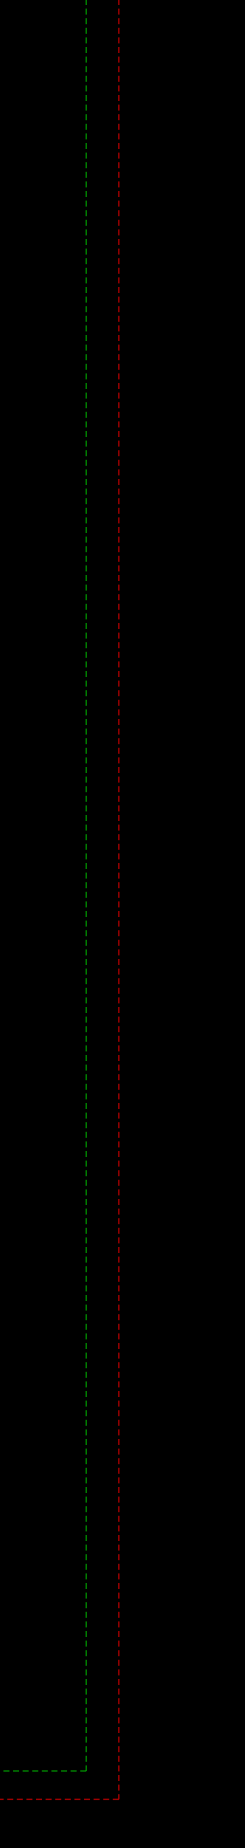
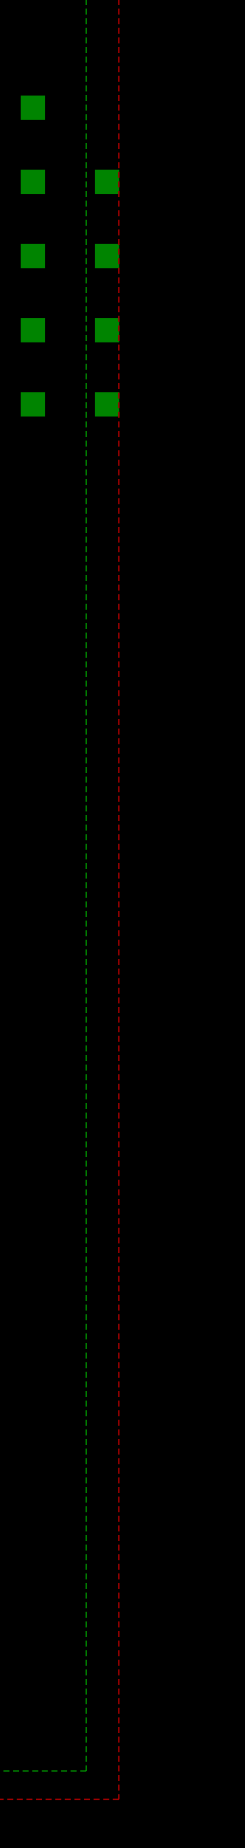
part: none -> (32, 107)
part: none -> (32, 181)
part: none -> (107, 181)
part: none -> (32, 256)
part: none -> (107, 256)
part: none -> (32, 330)
part: none -> (107, 330)
part: none -> (32, 404)
part: none -> (107, 404)

